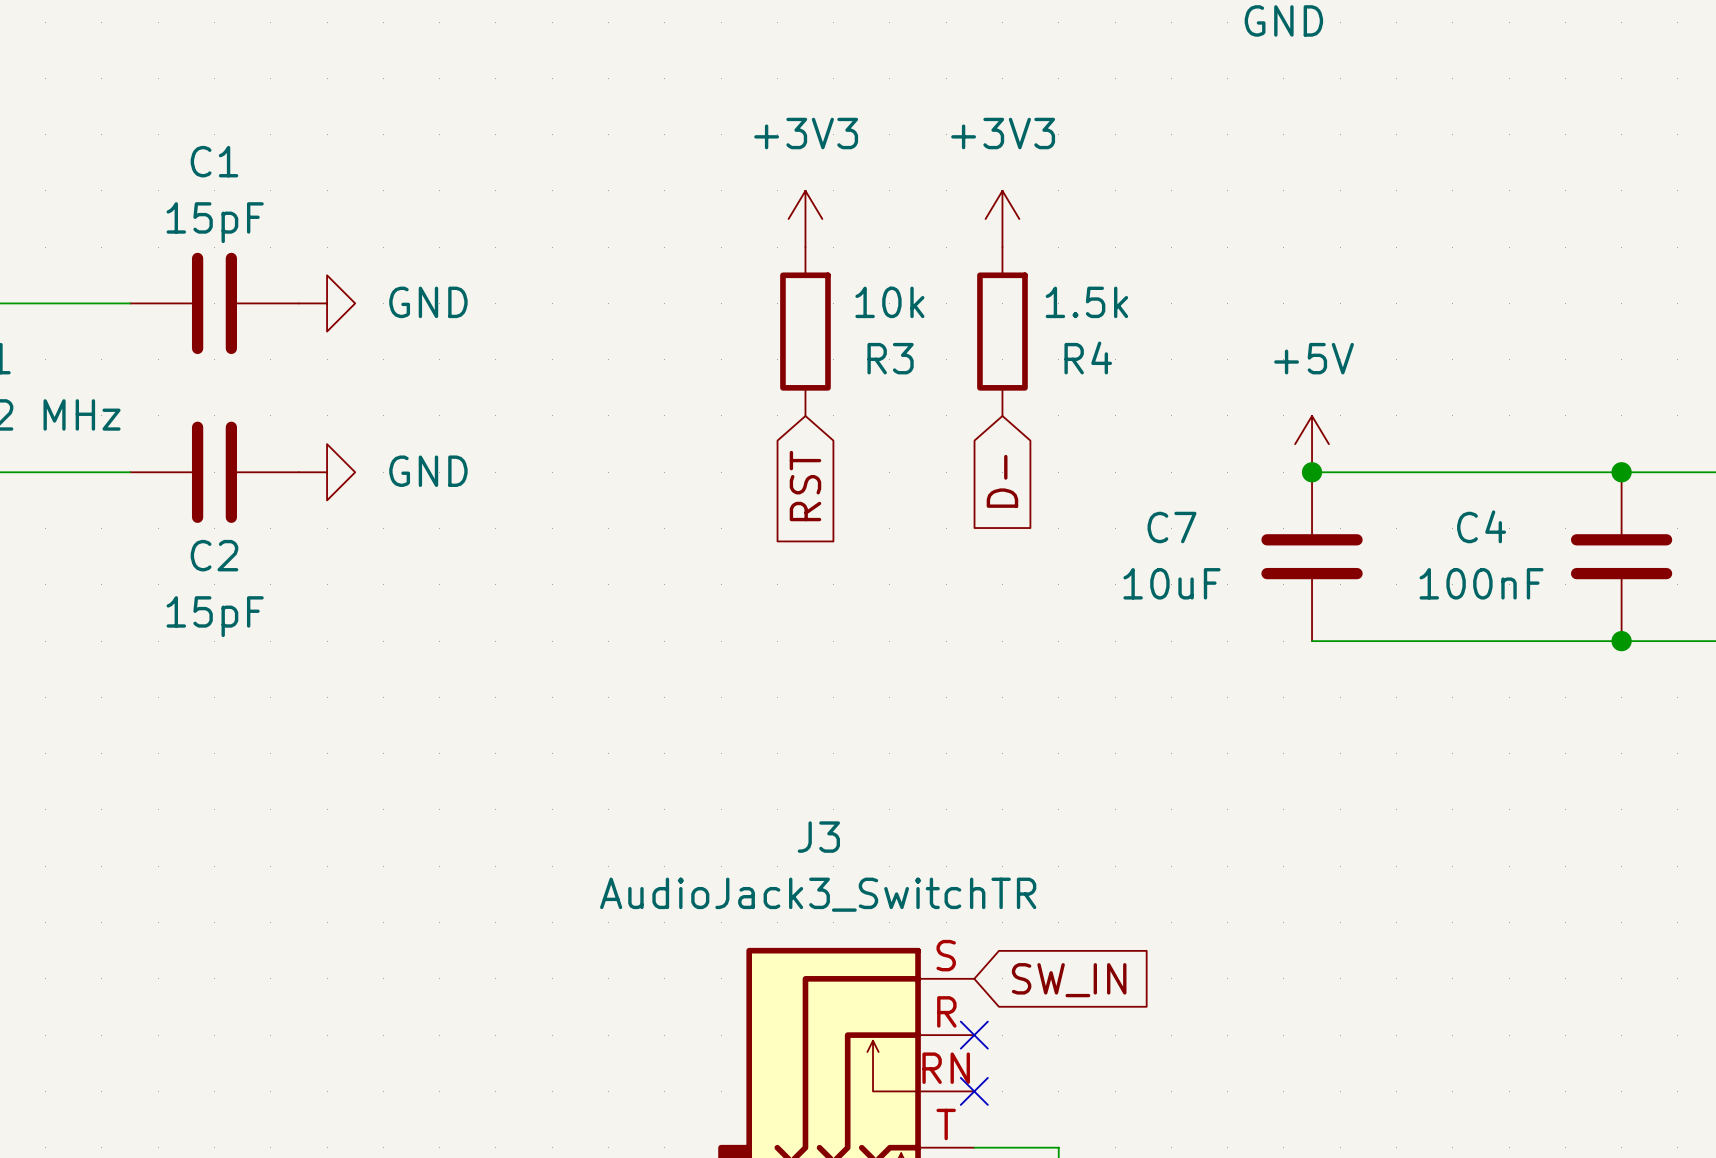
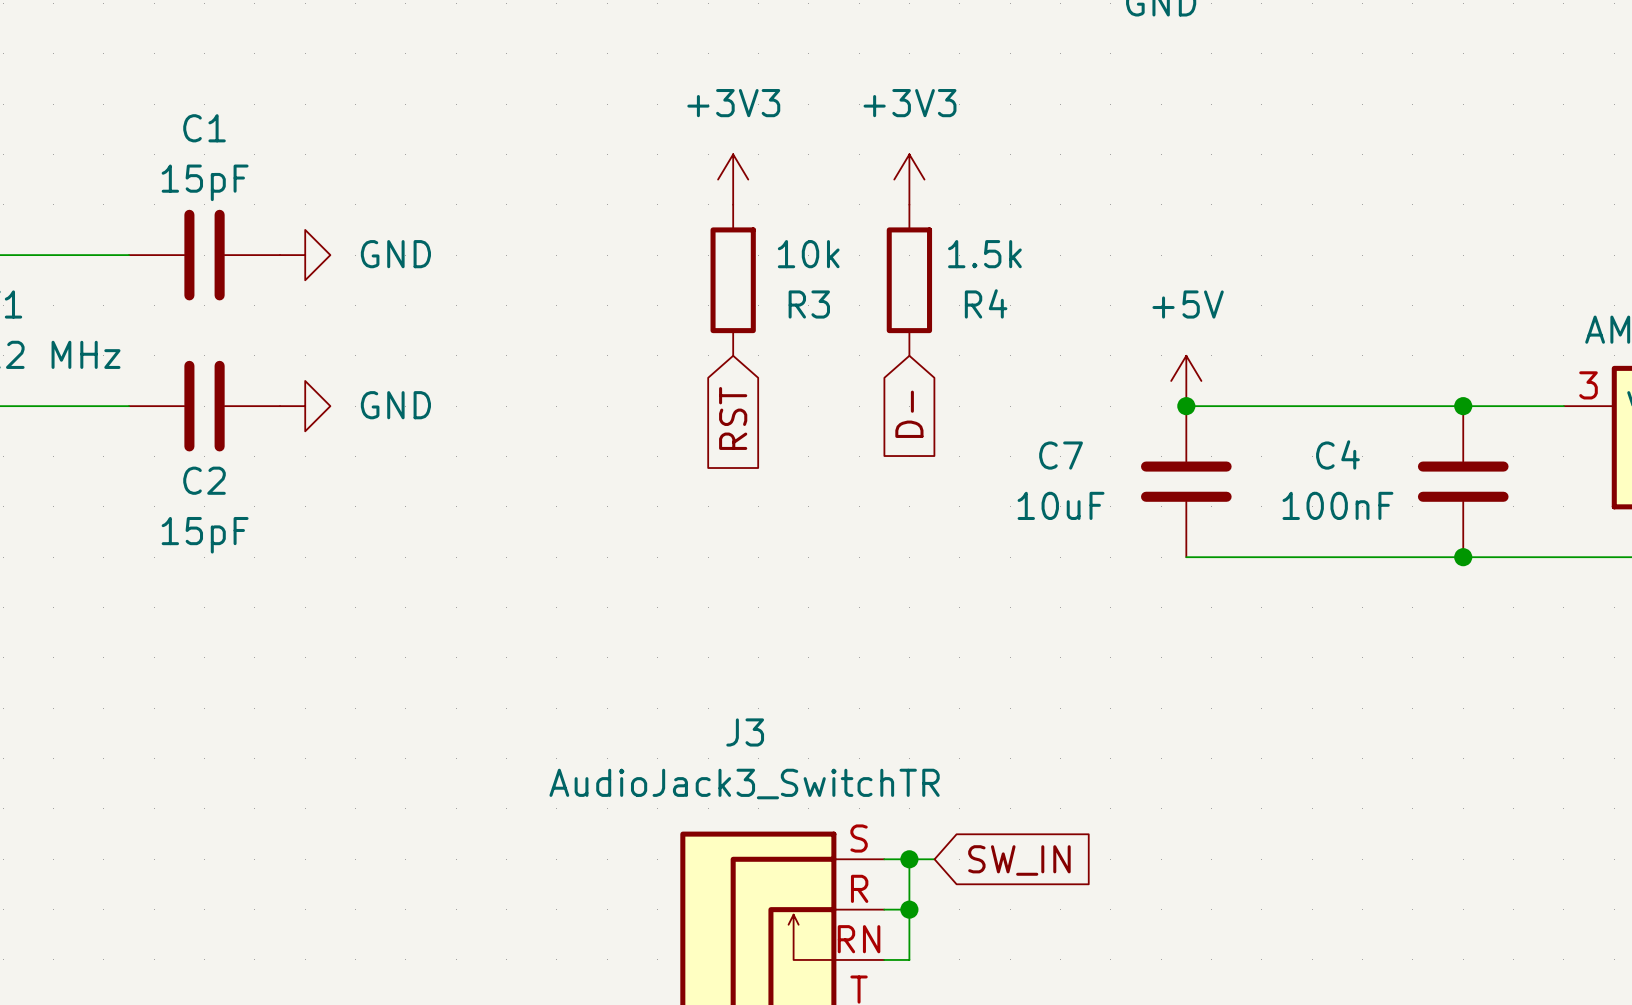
wire: none -> (884, 859) (934, 859)
wire: none -> (909, 859) (909, 959) (884, 959)
junction: none -> (909, 859)
global label position: SW_IN (1069, 980) -> SW_IN (1019, 860)
wire: none -> (884, 909) (909, 909)
no-connect mark: (974, 1035) -> none
junction: none -> (909, 909)
no-connect mark: (974, 1091) -> none

